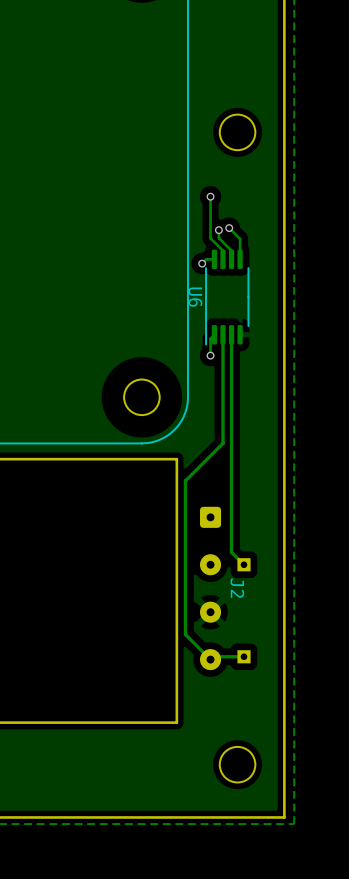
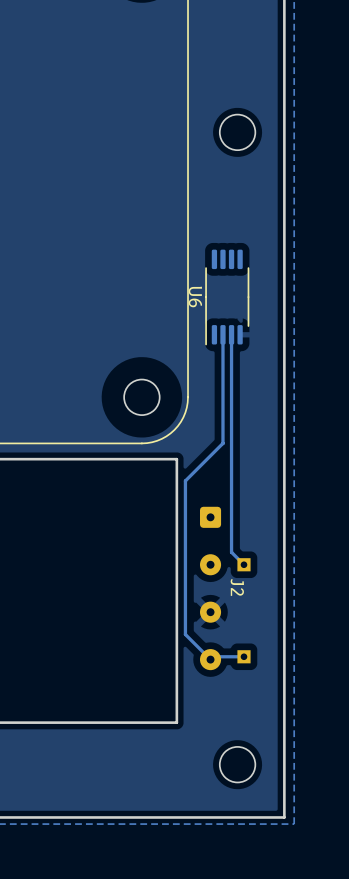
track: (210, 196) (210, 238) (222, 250) (222, 259) -> none
via: (210, 196) -> none
track: (229, 228) (240, 238) (240, 259) -> none
via: (229, 228) -> none
track: (218, 230) (218, 238) (231, 250) (231, 259) -> none
via: (218, 230) -> none
track: (214, 259) (206, 259) (202, 263) -> none
via: (202, 263) -> none
track: (214, 334) (210, 338) (210, 355) -> none
via: (210, 355) -> none

